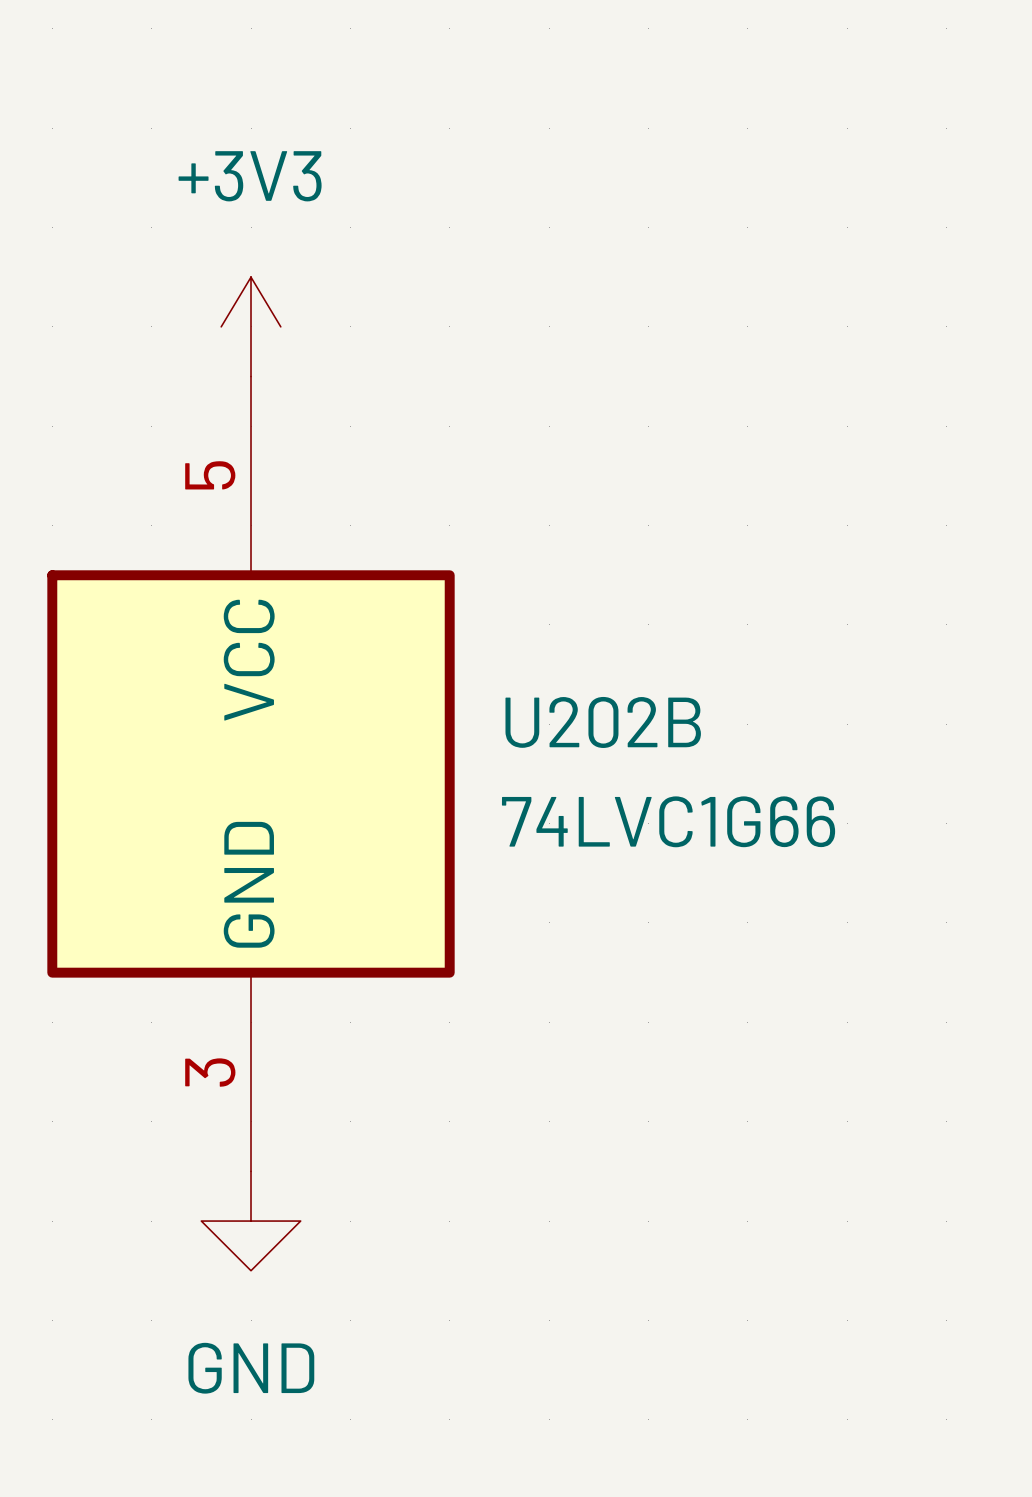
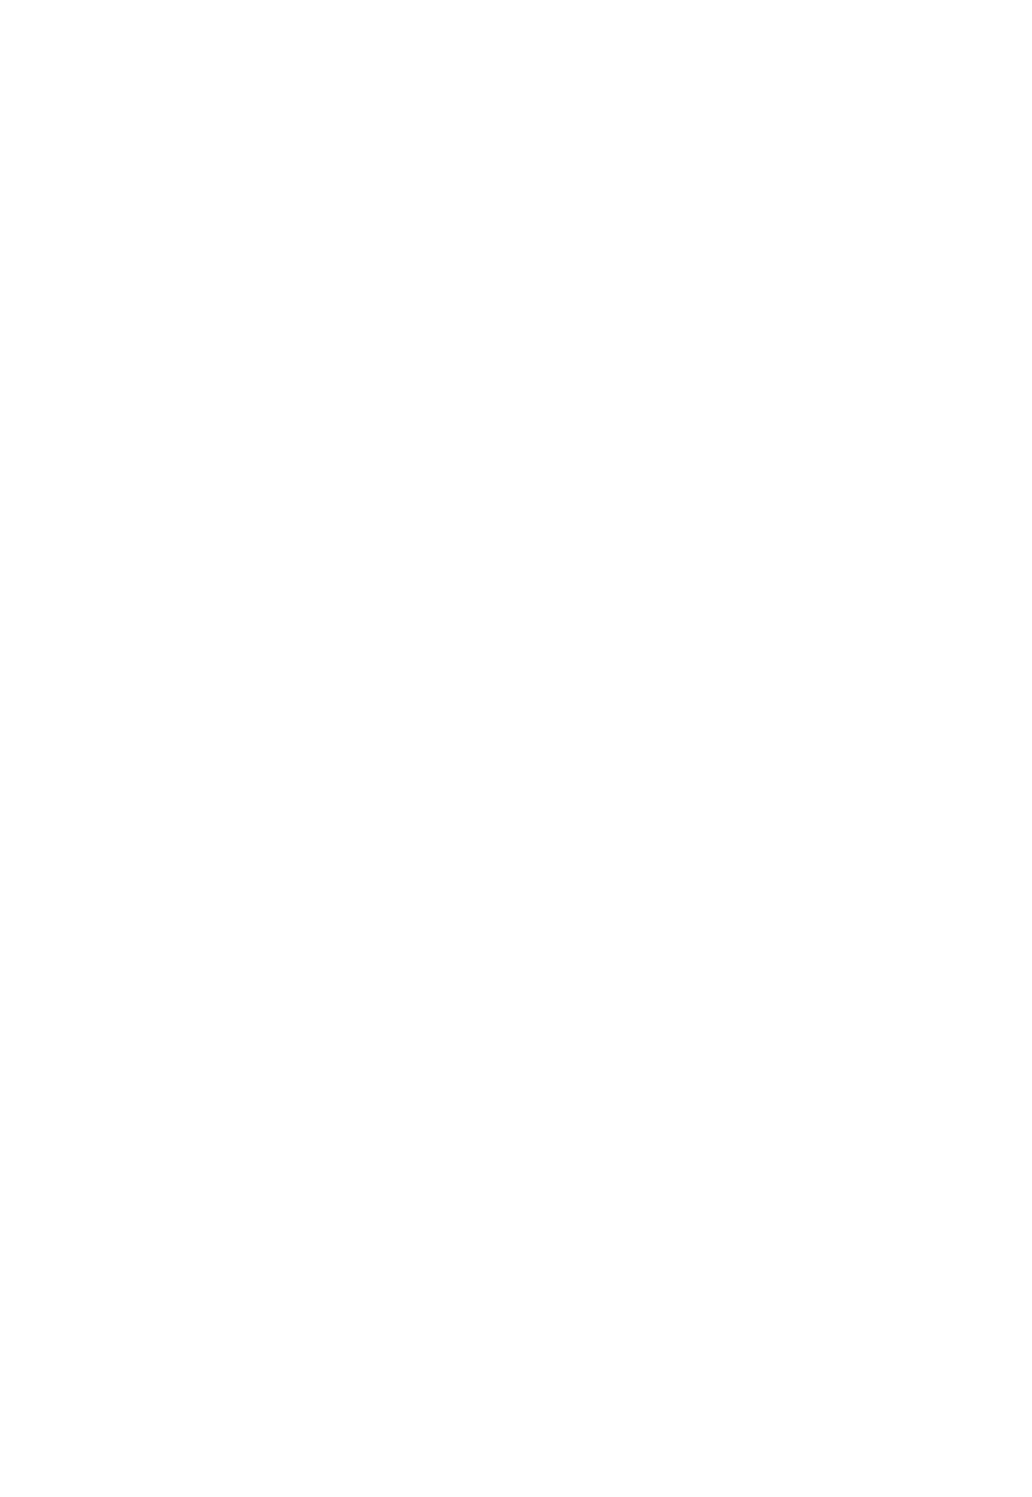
power symbol: +3V3 (251, 326) -> none
U202B: 74LVC1G66 (251, 773) -> none
power symbol: GND (251, 1221) -> none

